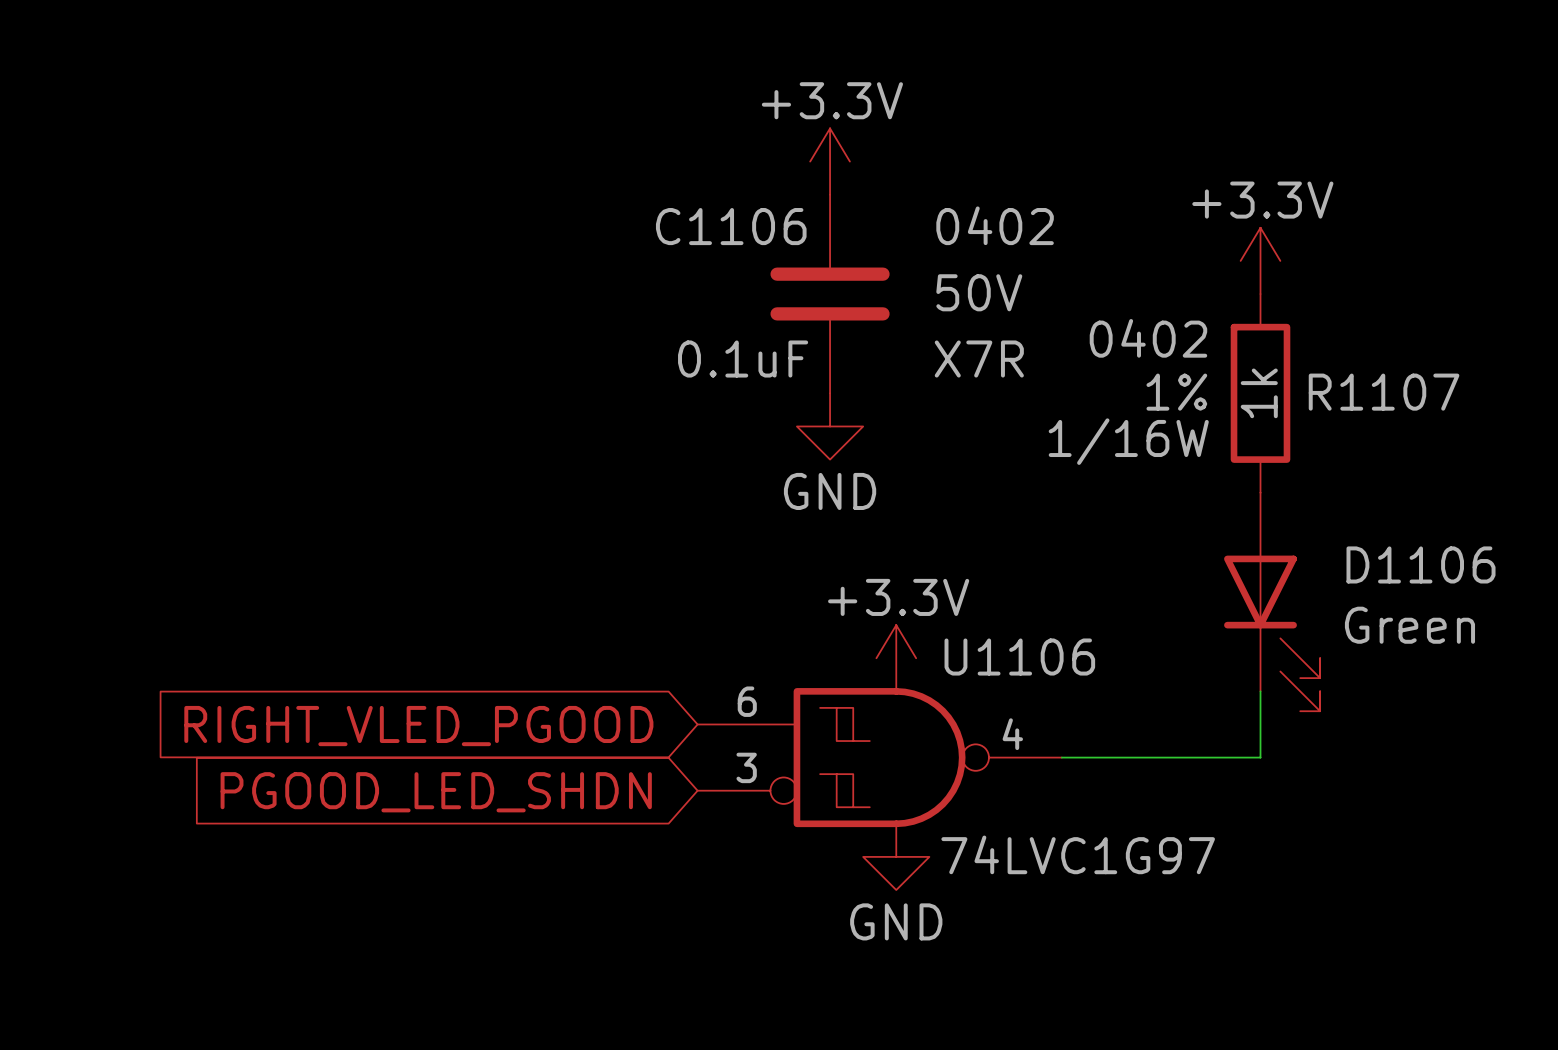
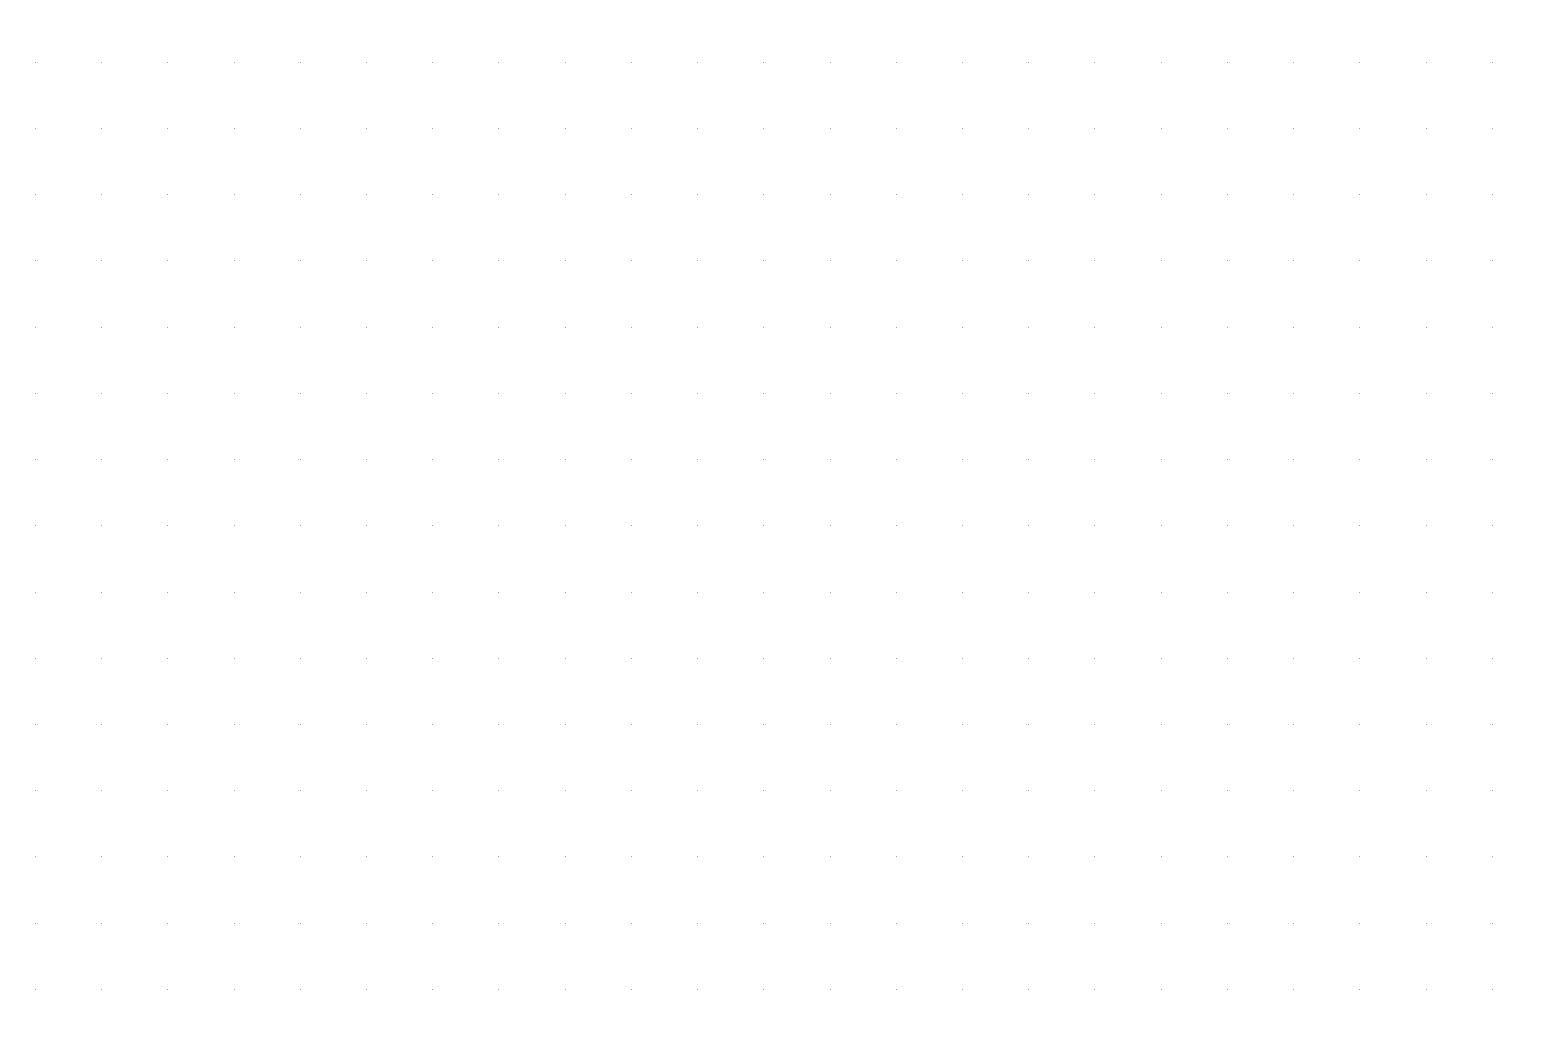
power symbol: +3.3V (830, 161) -> none
power symbol: +3.3V (1260, 260) -> none
C1106: 0.1uF (830, 294) -> none
R1107: 1k (1260, 393) -> none
power symbol: GND (830, 426) -> none
D1106: Green (1272, 601) -> none
power symbol: +3.3V (896, 658) -> none
wire: (1260, 691) (1260, 757) (1061, 757) -> none
global label: RIGHT_VLED_PGOOD (418, 726) -> none
U1106: 74LVC1G97 (879, 757) -> none
global label: PGOOD_LED_SHDN (436, 792) -> none
power symbol: GND (896, 856) -> none

